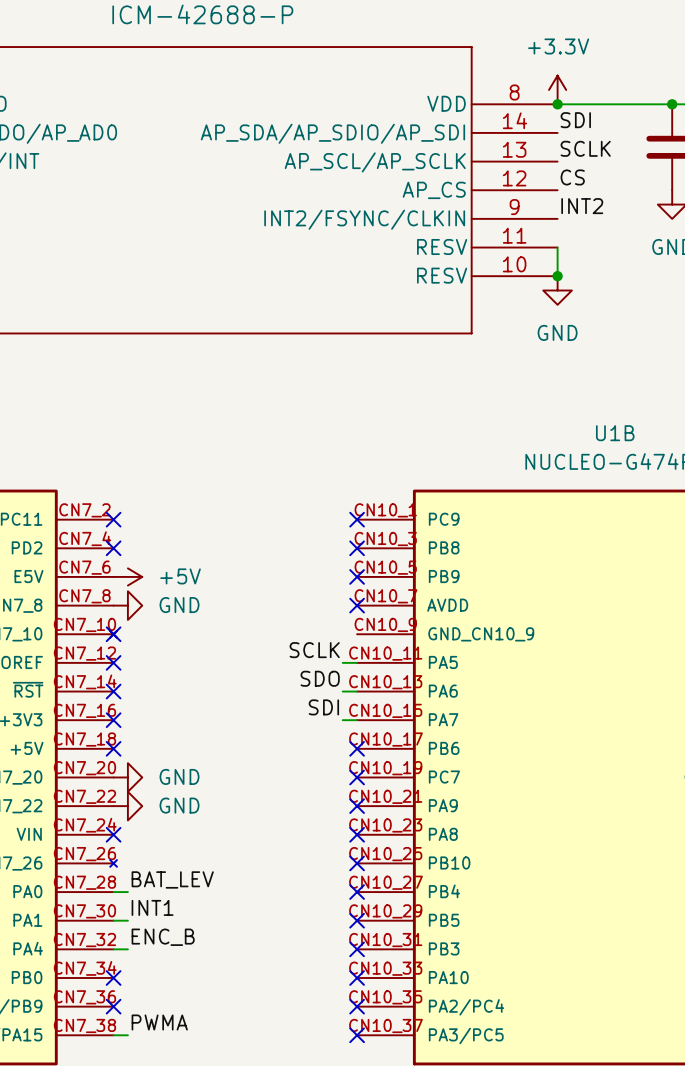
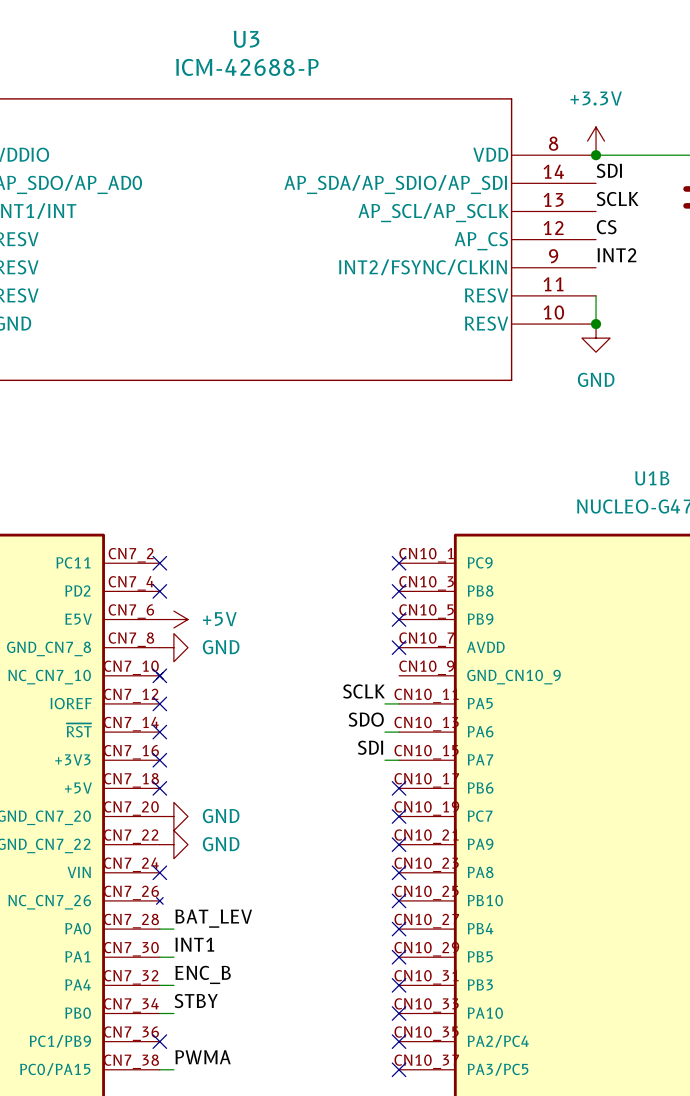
label: none -> STBY (196, 1001)
wire: none -> (159, 1013) (173, 1013)
no-connect mark: (113, 978) -> none

